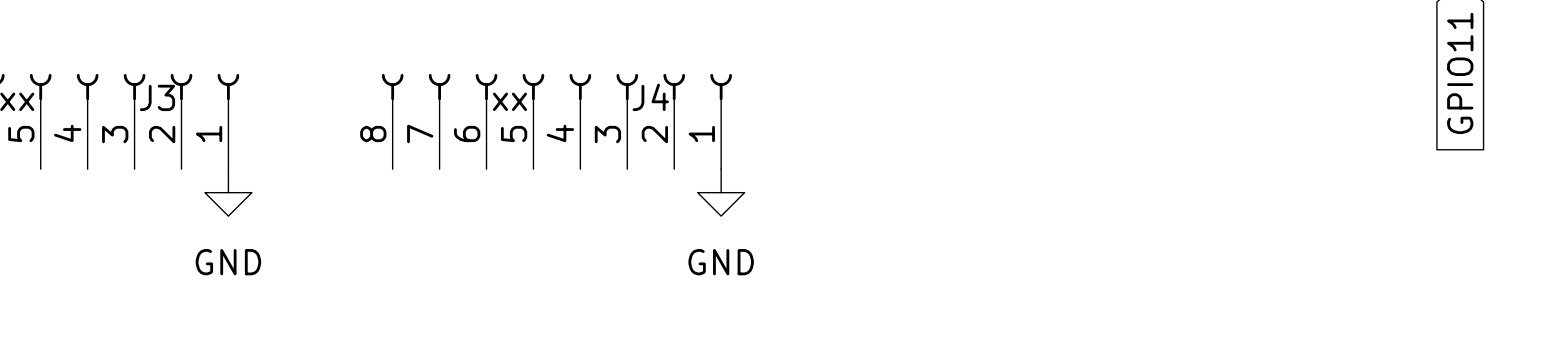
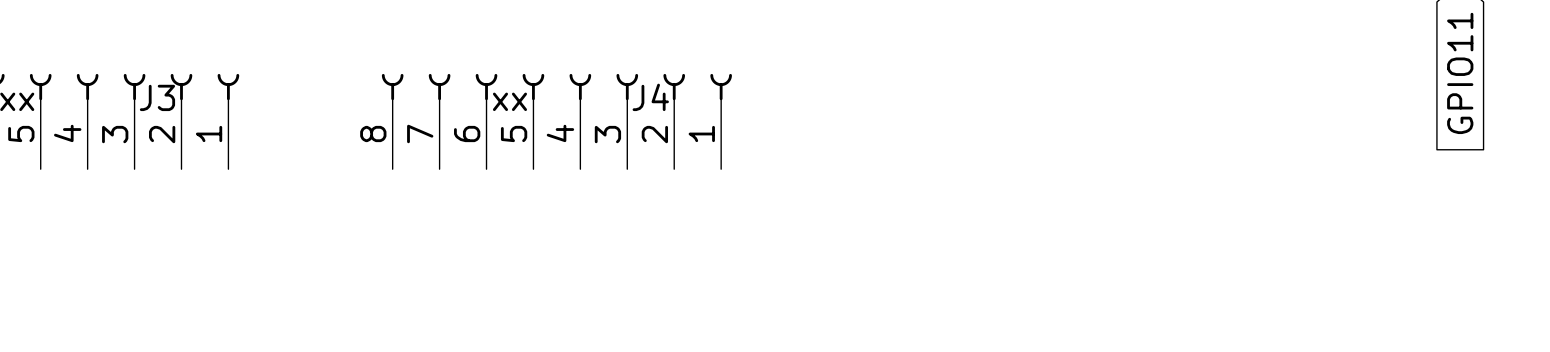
power symbol: GND (228, 192) -> none
power symbol: GND (721, 192) -> none

